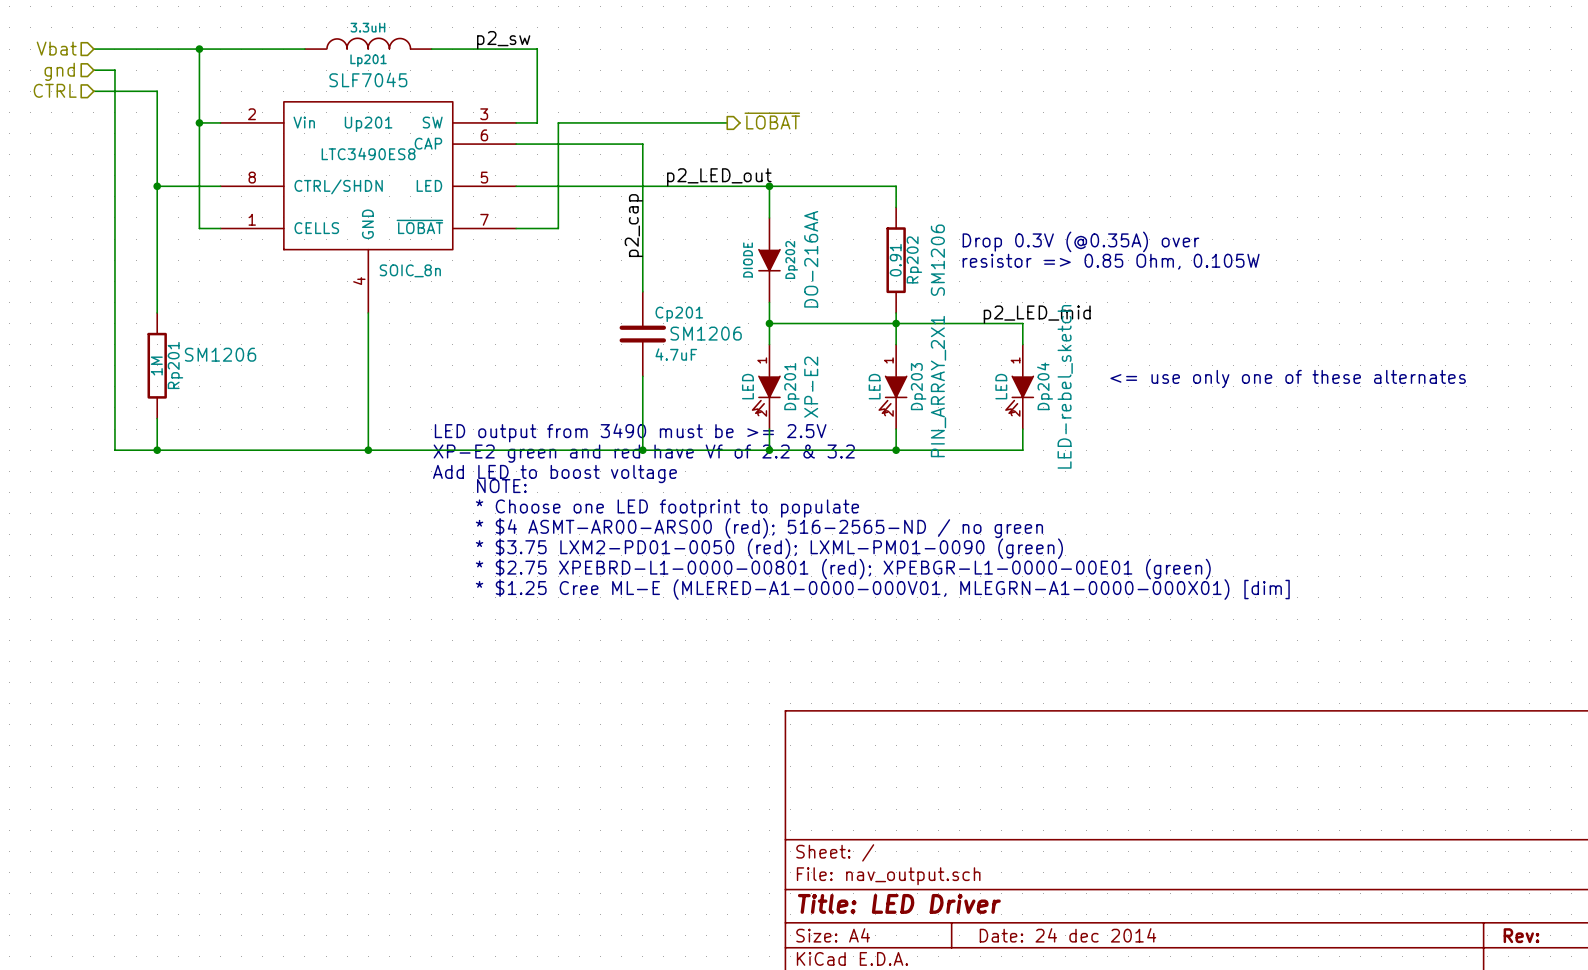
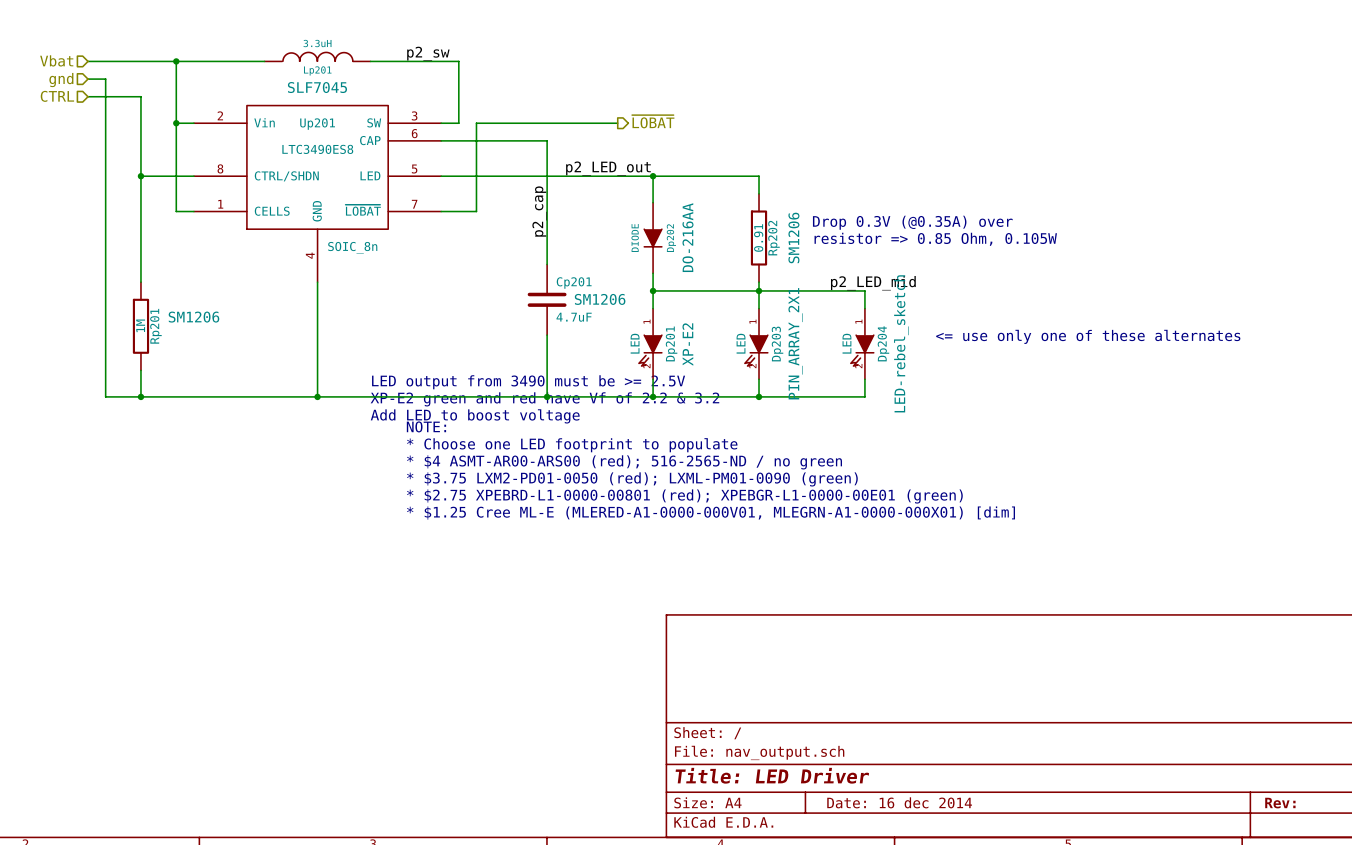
title block: Date: 24 dec 2014 (1067, 935) -> Date: 16 dec 2014 (899, 802)

